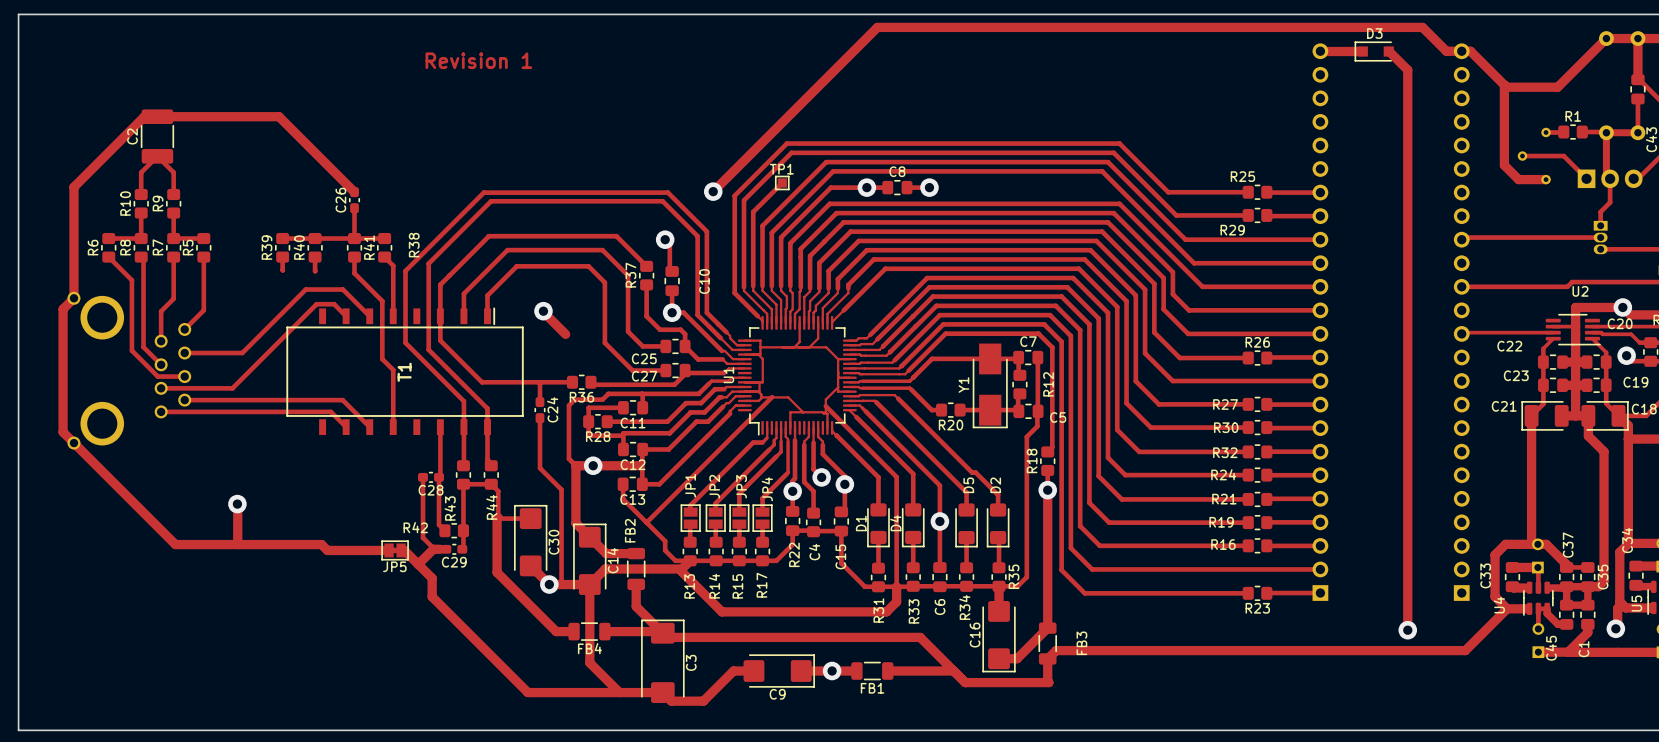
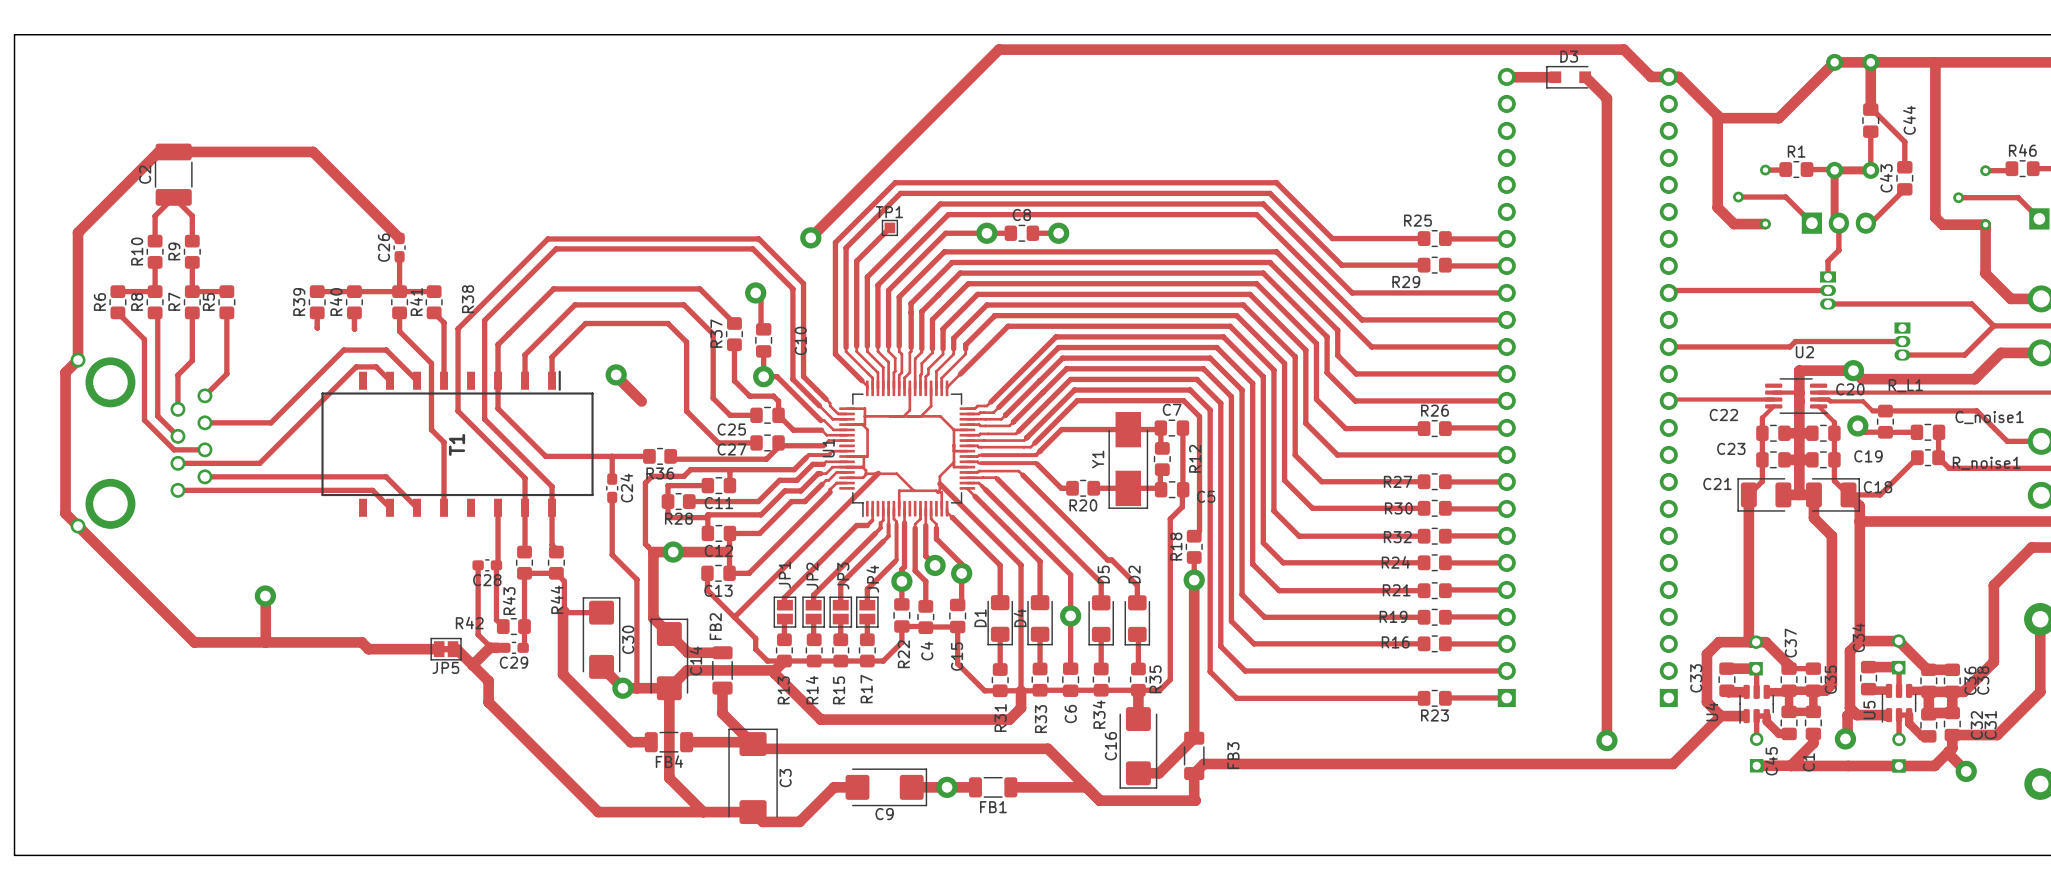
text: Revision 1 (478, 60) -> none

